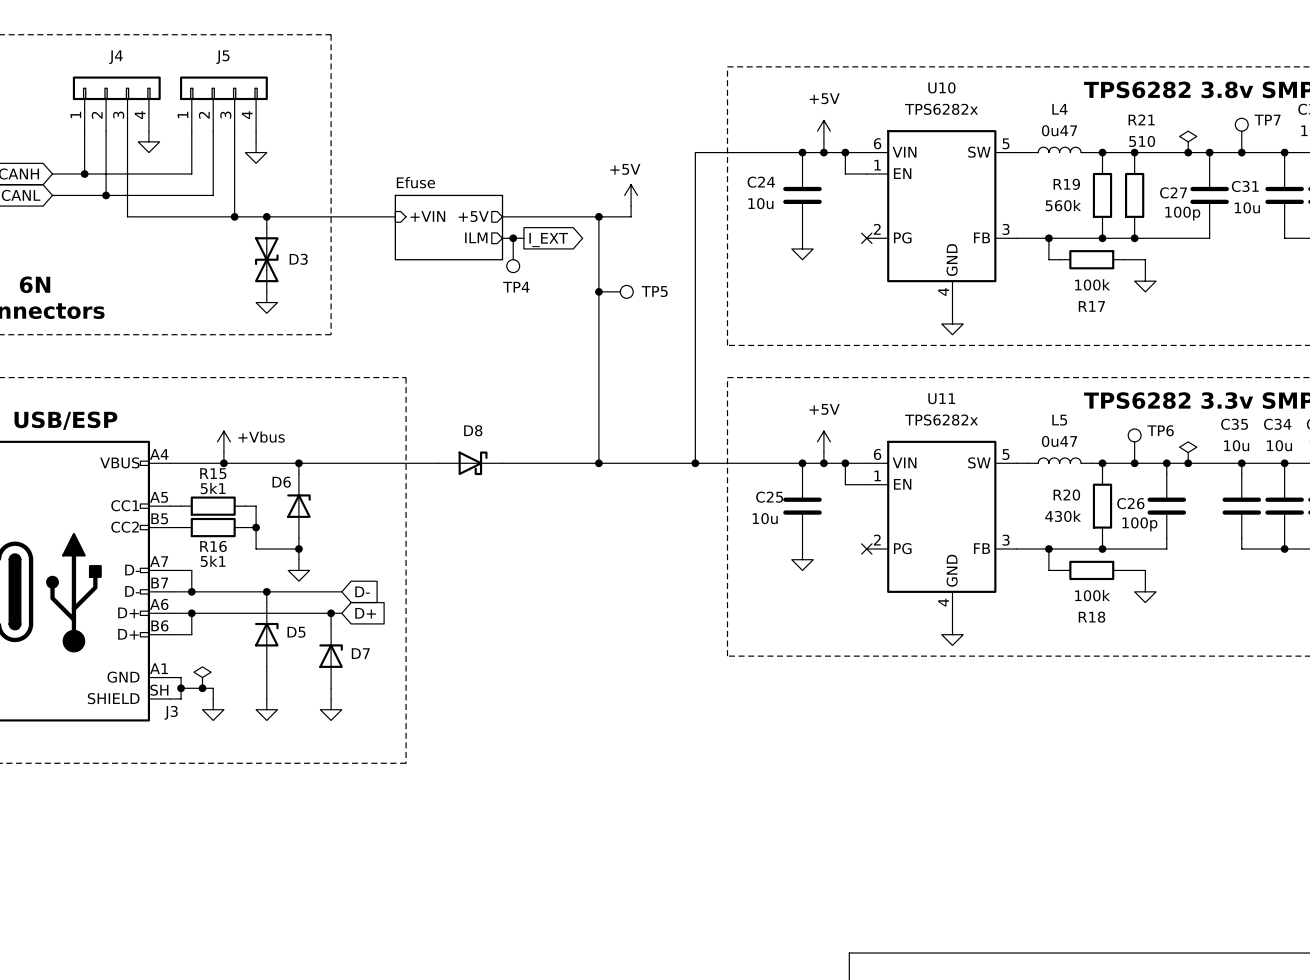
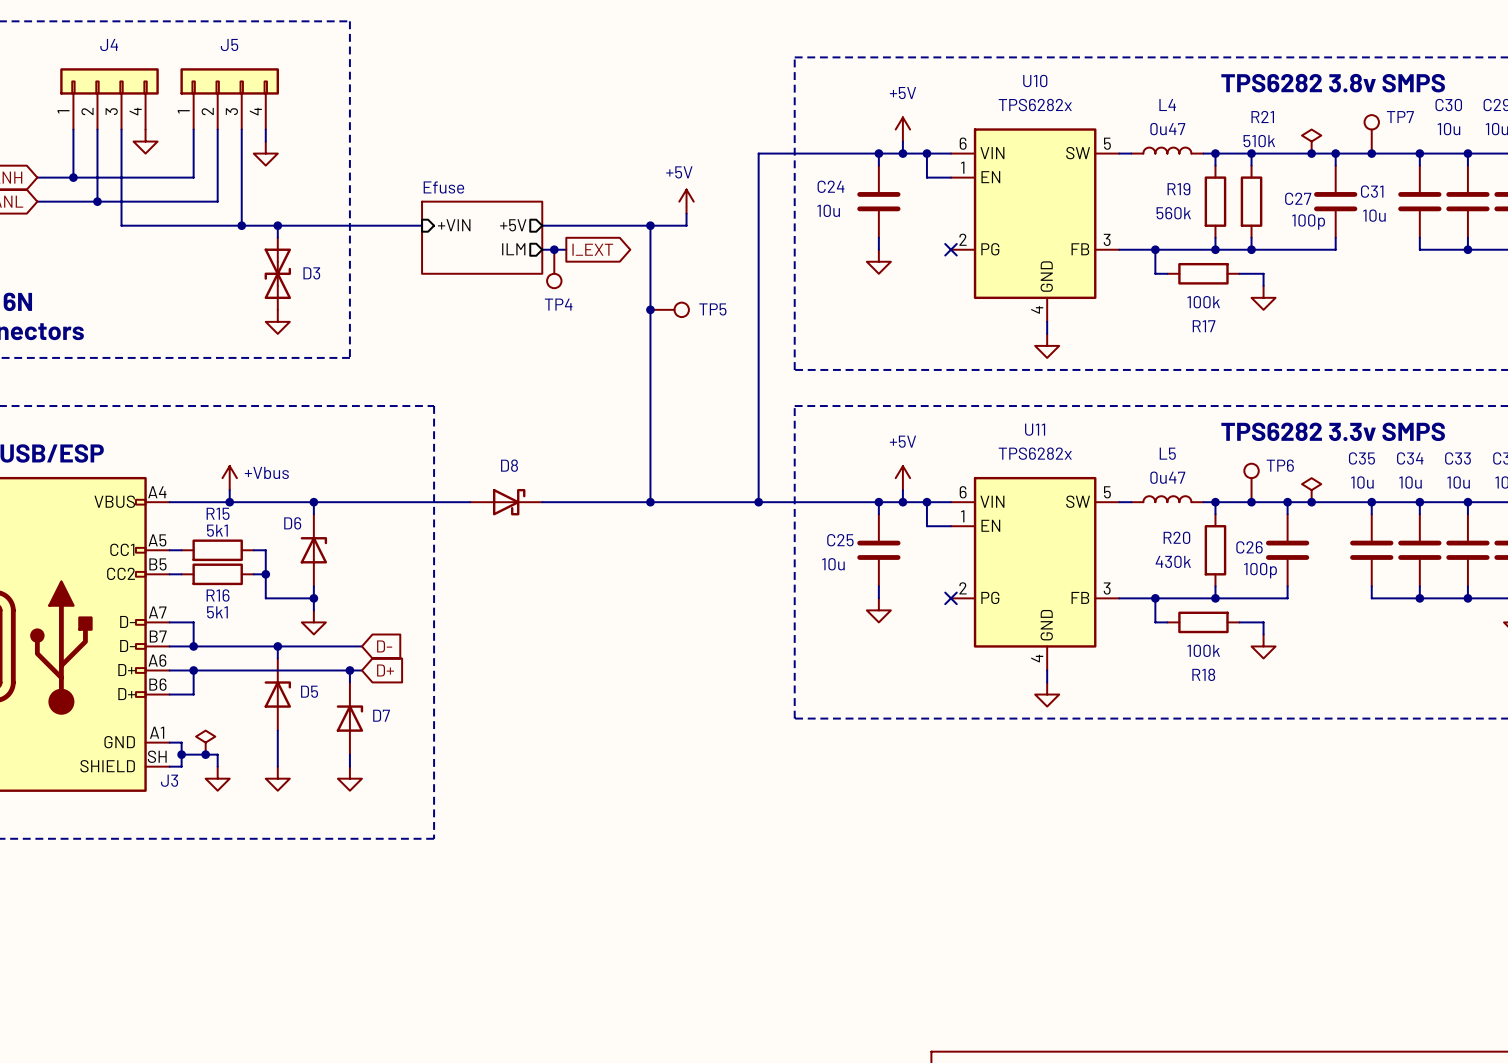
R21 value: 510 (1142, 141) -> 510k (1259, 141)

